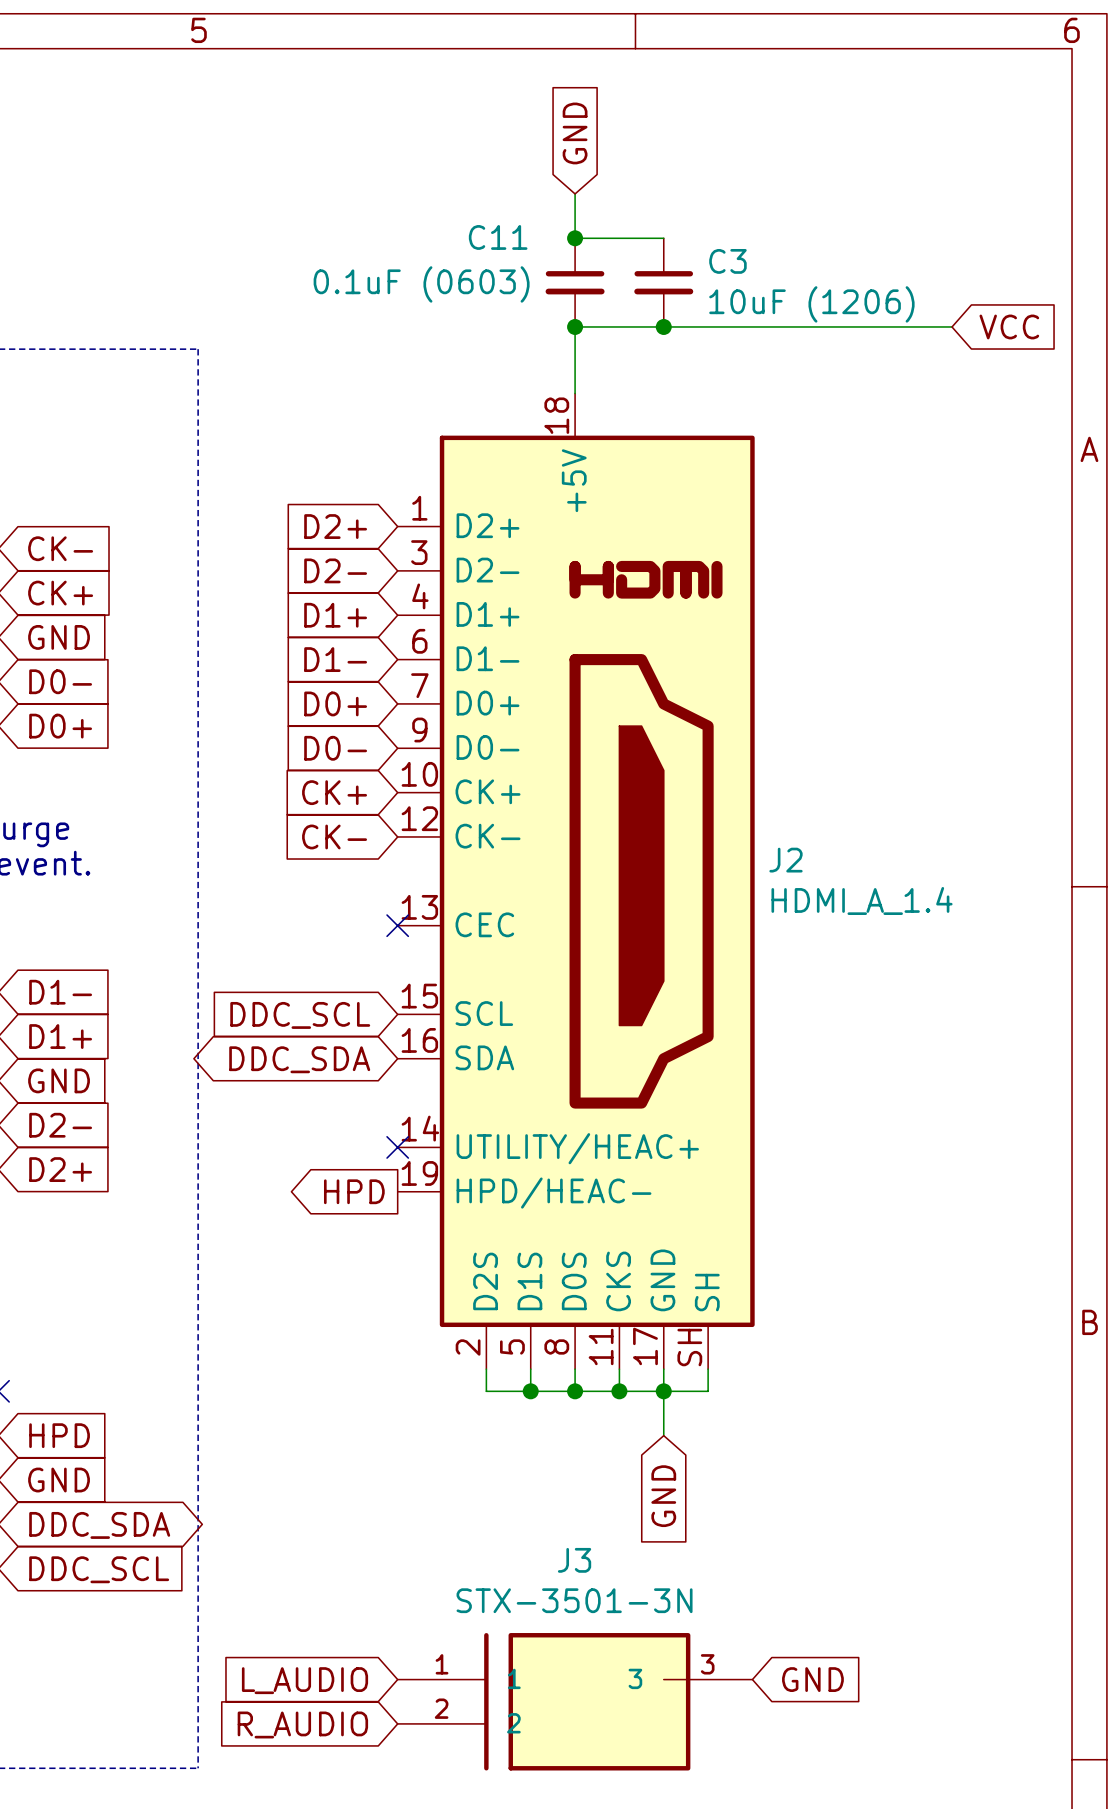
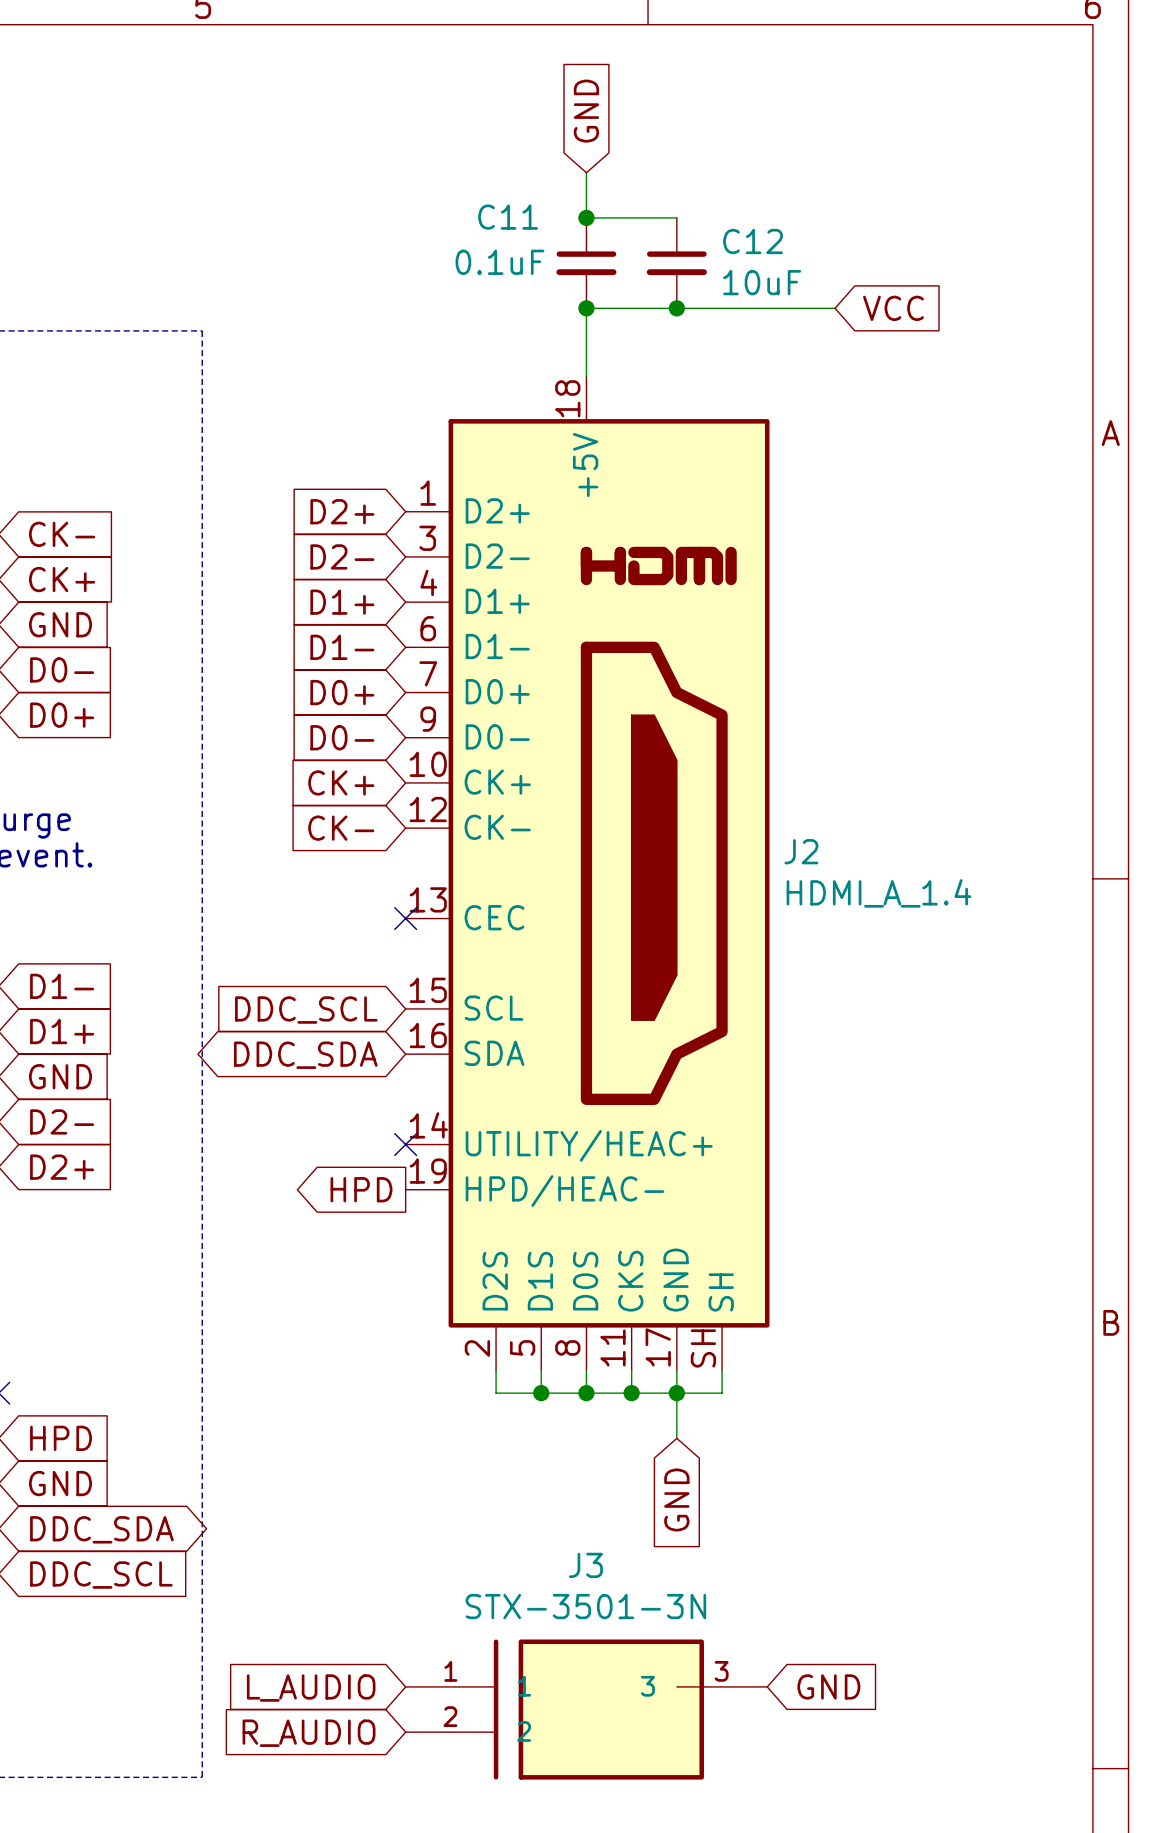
C3 name: C3 (727, 261) -> C12 (753, 241)
C11 value: 0.1uF (0603) (421, 284) -> 0.1uF (499, 262)
C3 value: 10uF (1206) (811, 304) -> 10uF (762, 282)
wire: (818, 326) (952, 326) -> none
global label position: VCC (1009, 326) -> VCC (893, 308)

